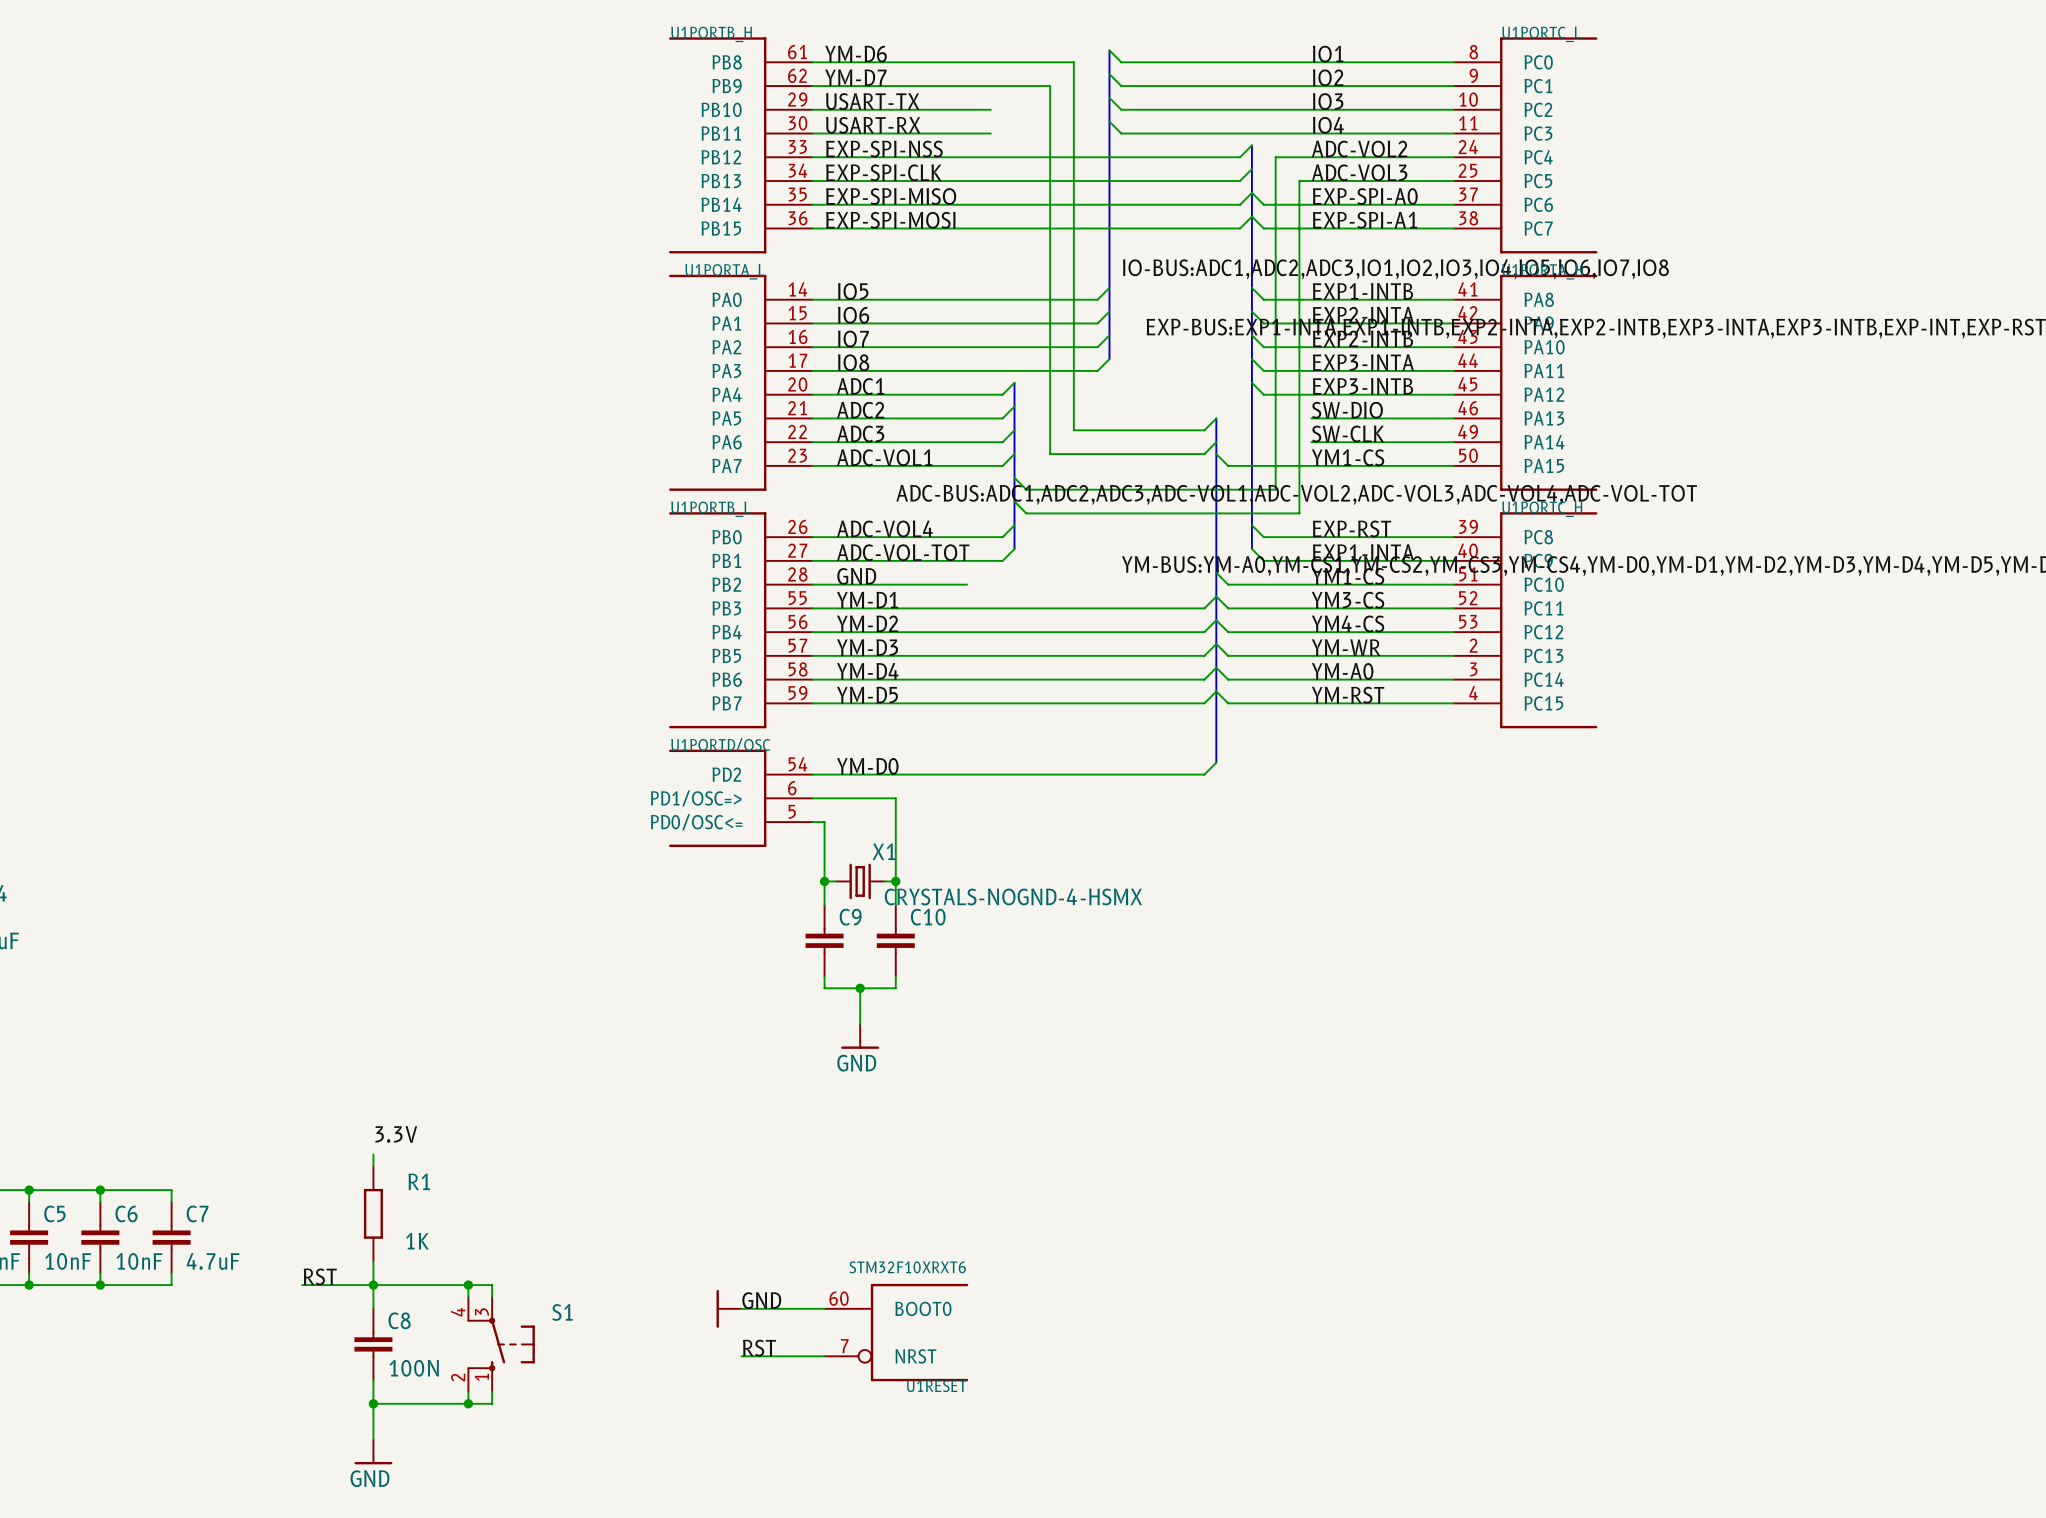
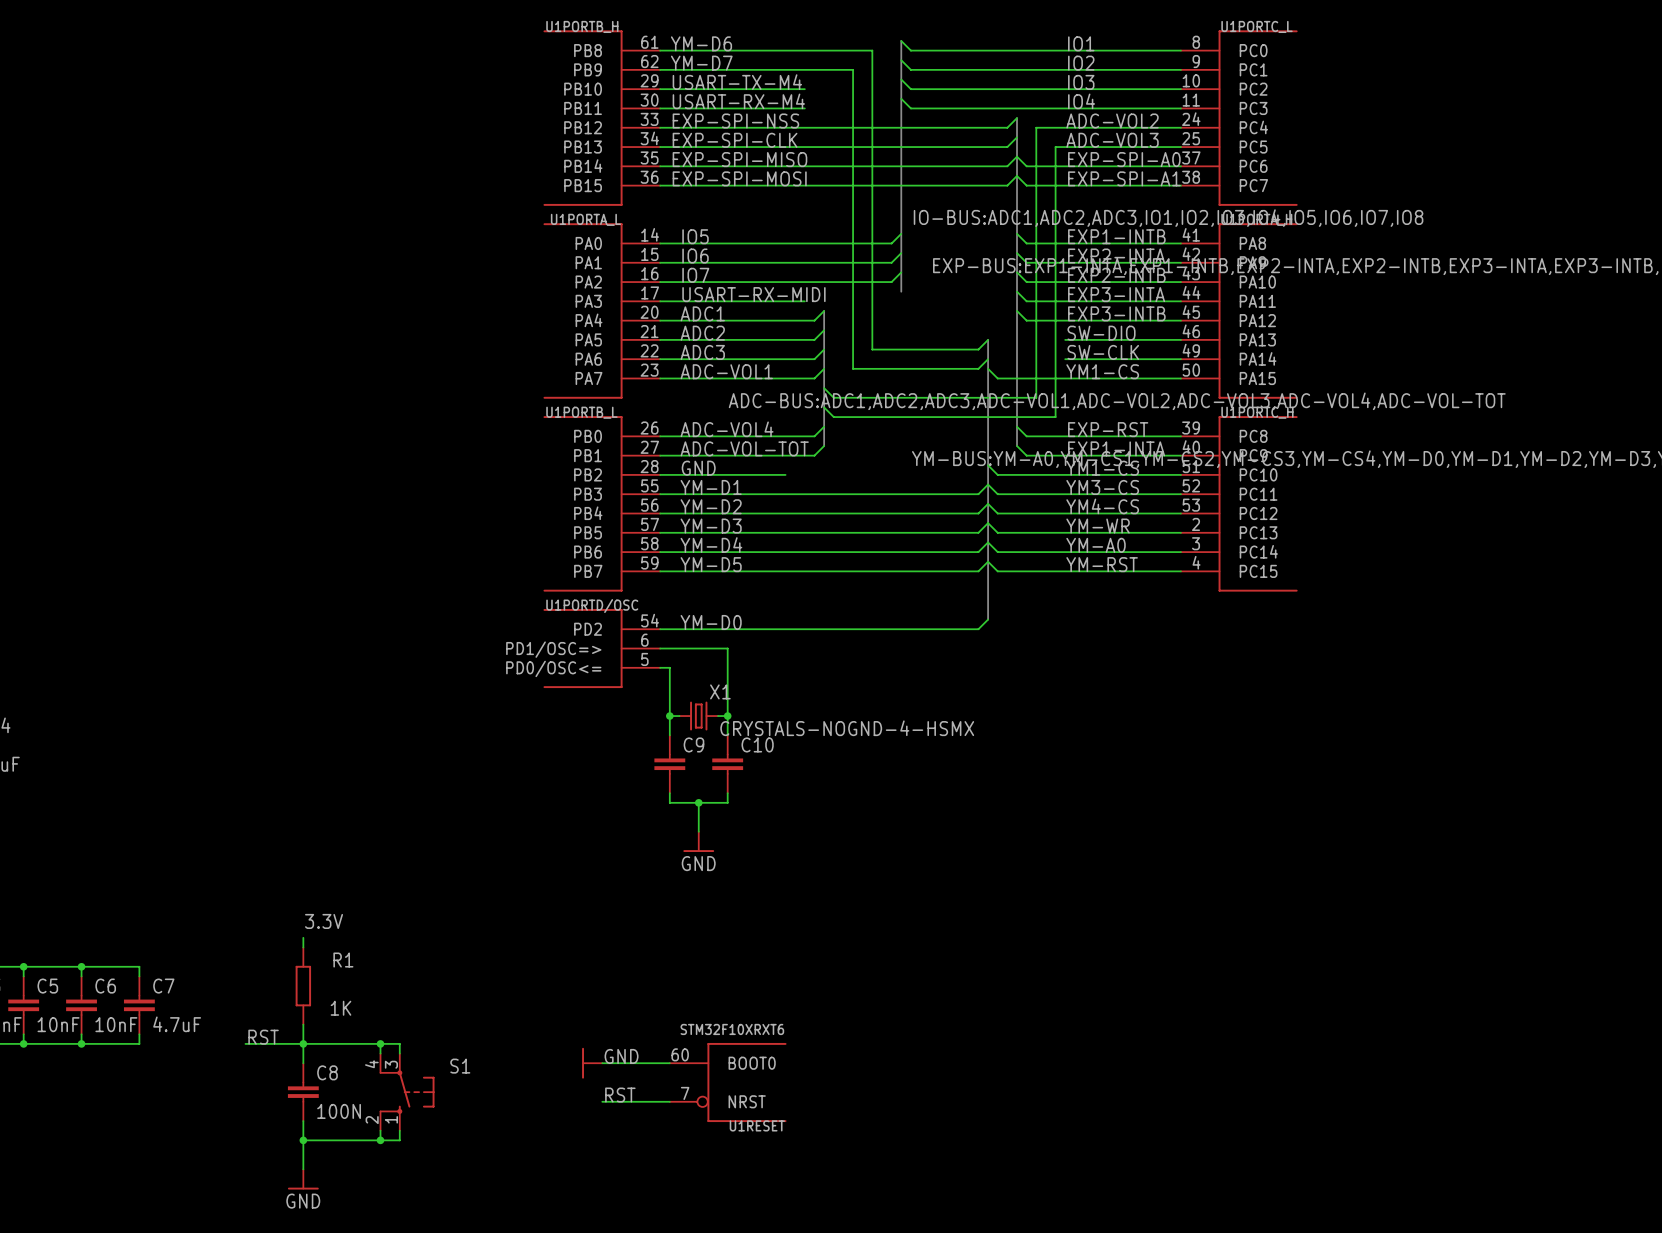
label: USART-TX (872, 101) -> USART-TX-M4 (737, 82)
label: USART-RX (873, 125) -> USART-RX-M4 (738, 101)
wire: (1109, 359) (1097, 370) (990, 370) -> none
label: IO8 (853, 362) -> USART-RX-MIDI (753, 294)

